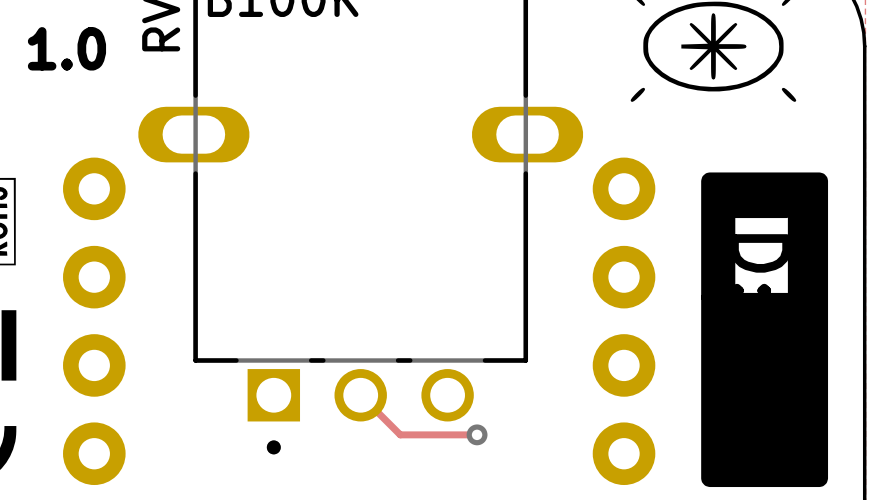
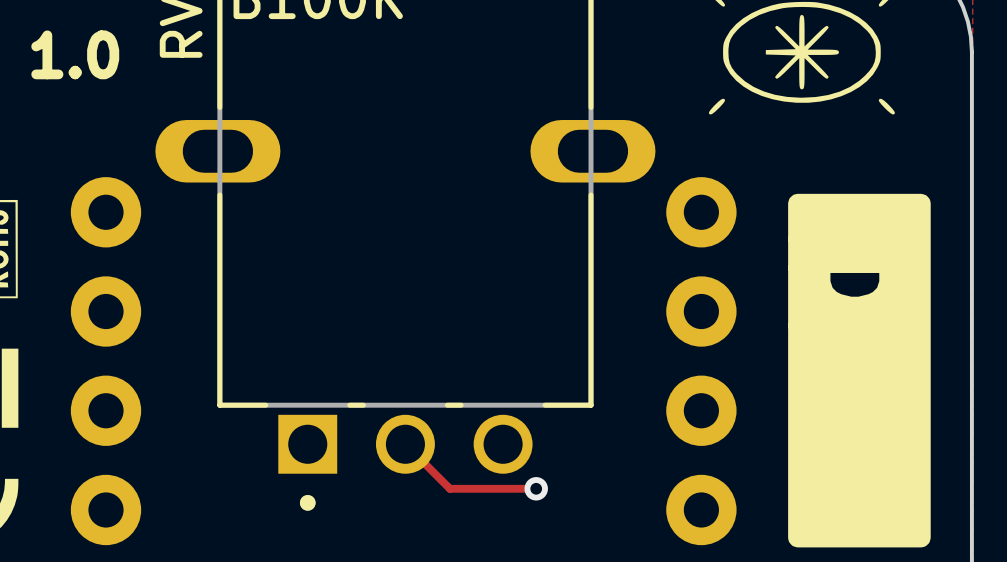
drawing shape: [701, 172, 829, 488] -> [788, 193, 931, 548]

